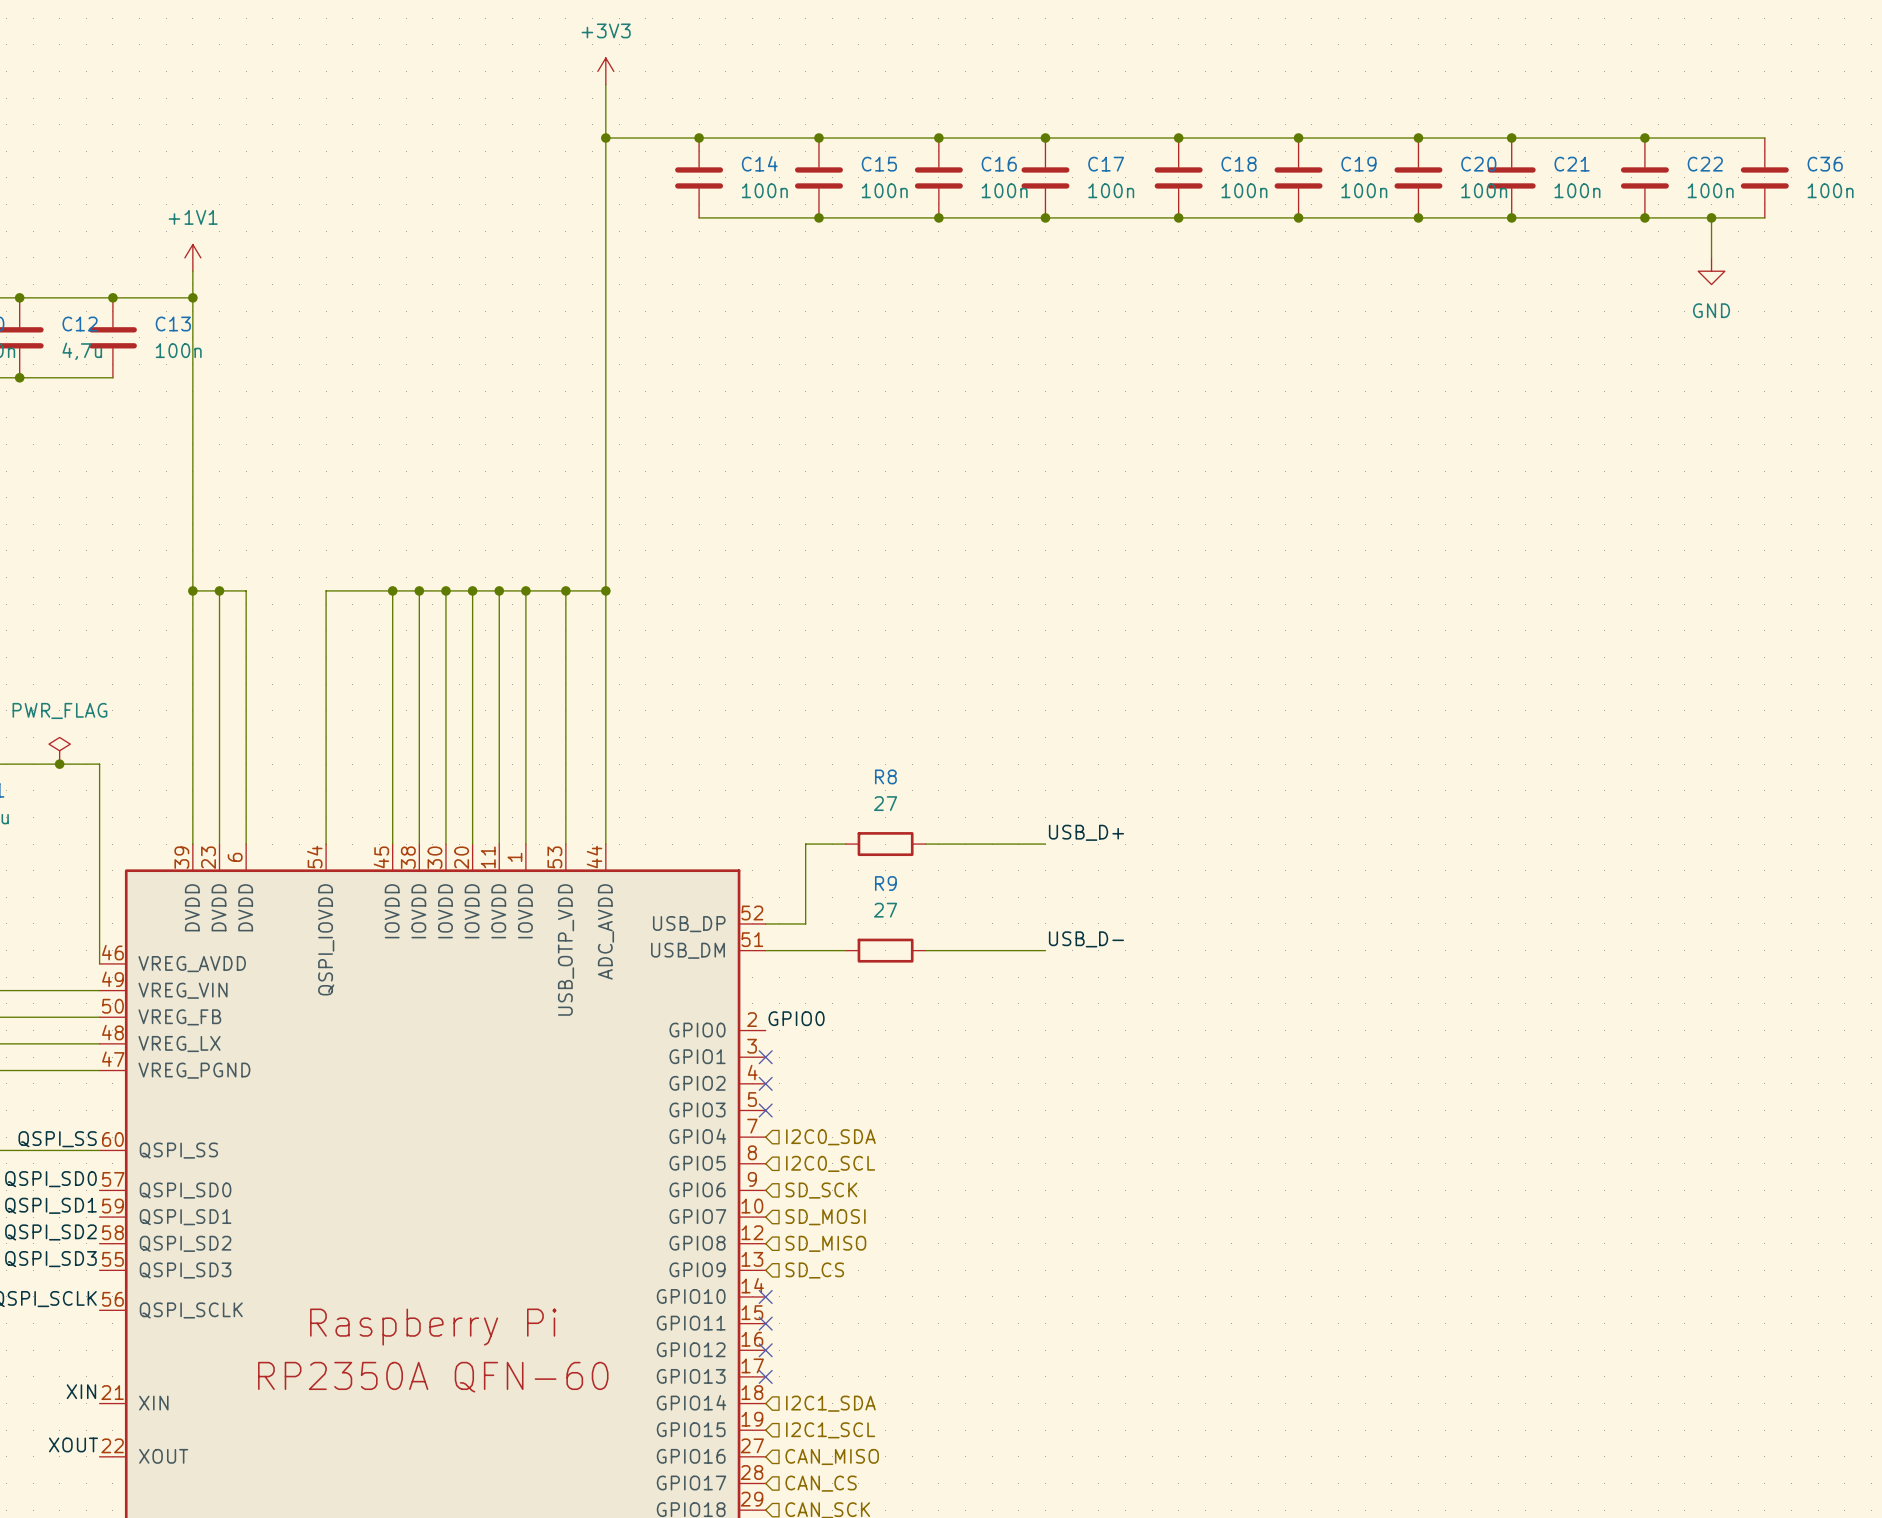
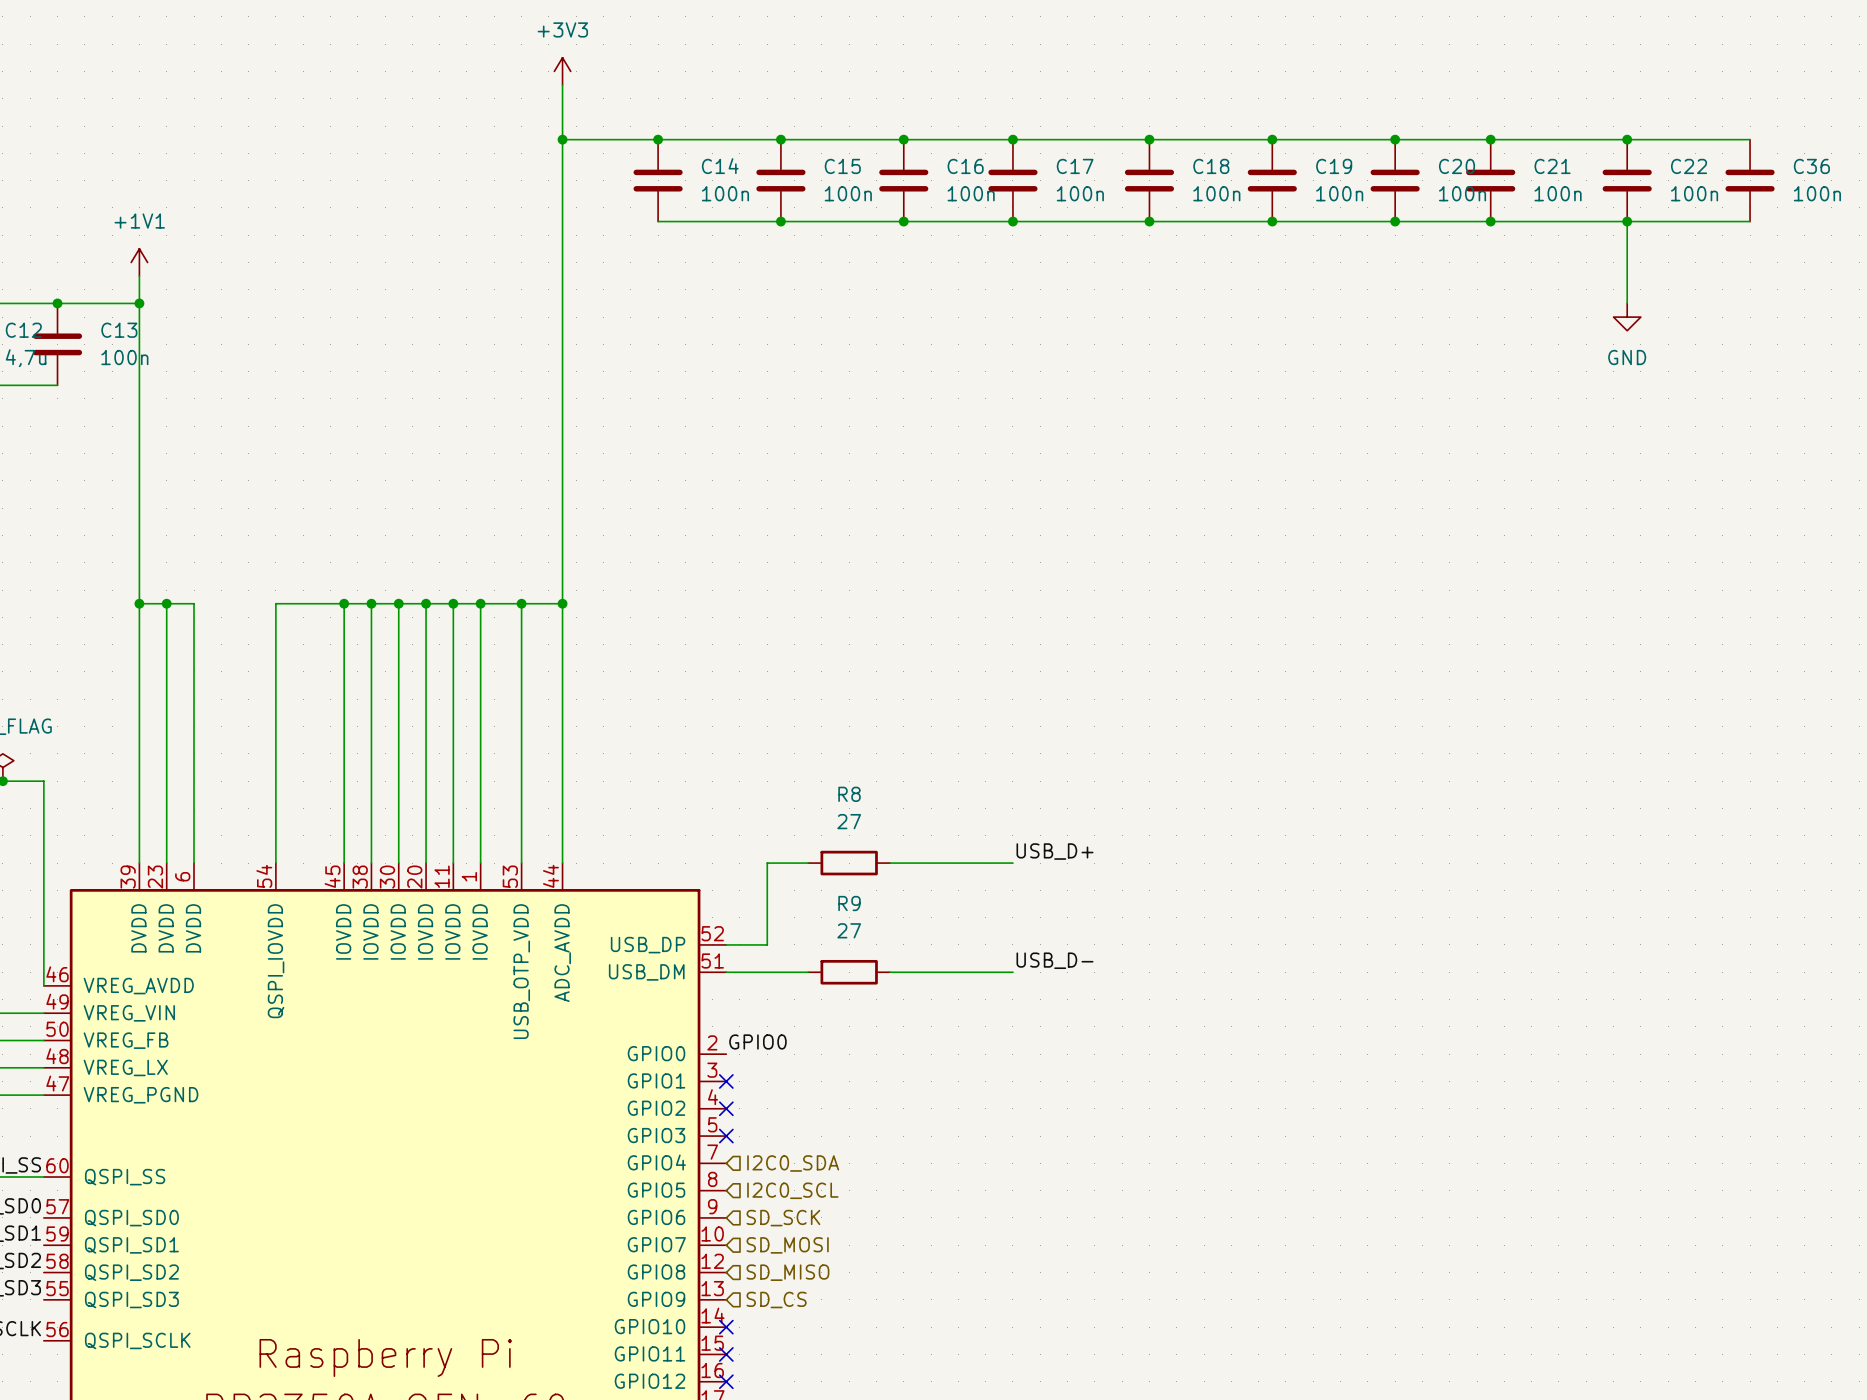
wire: none -> (1627, 221) (1627, 303)
wire: (1711, 217) (1711, 257) -> none
junction: (1711, 217) -> none
power symbol position: GND (1711, 271) -> GND (1627, 317)

